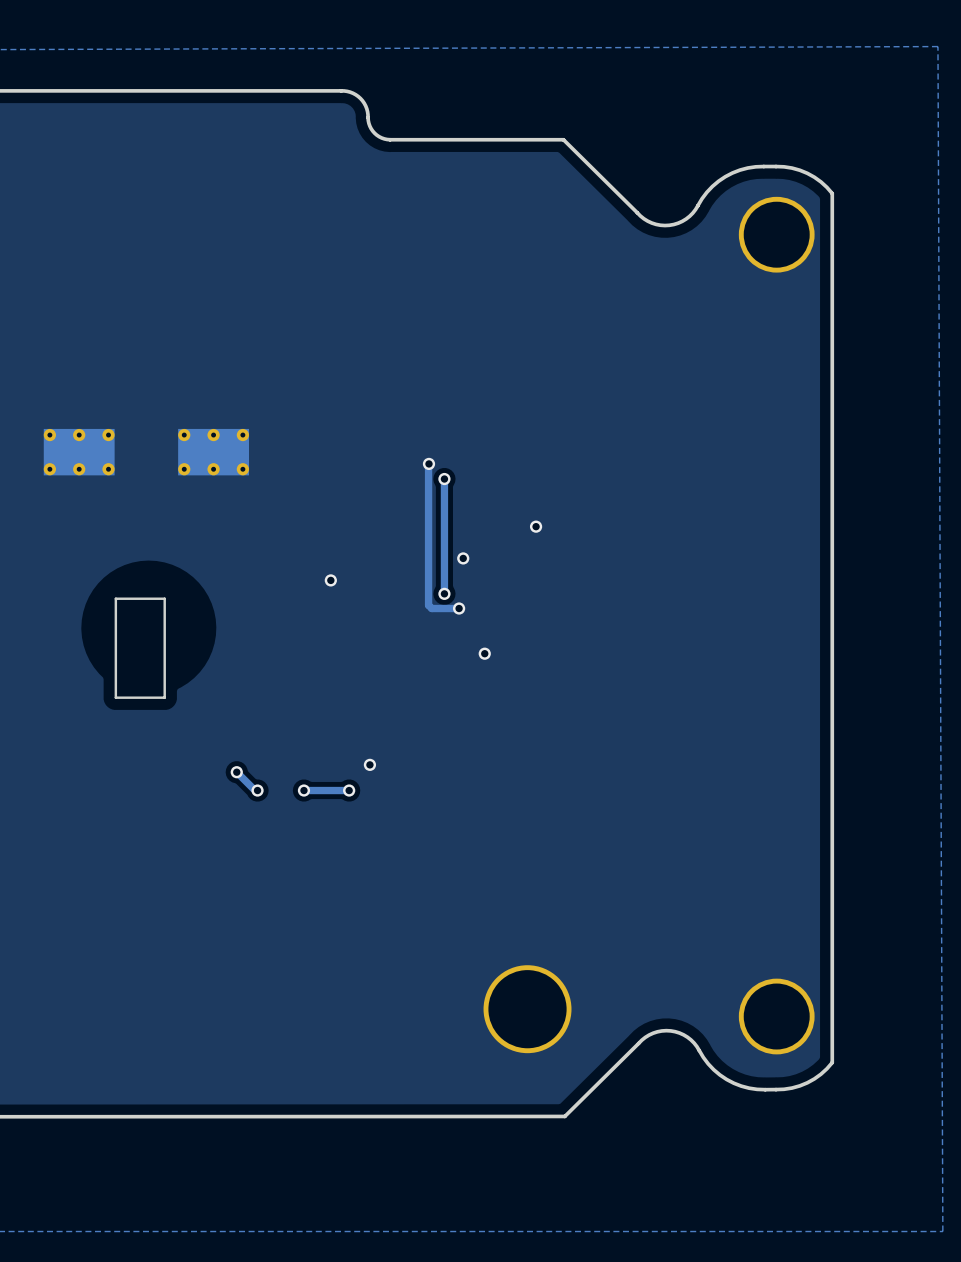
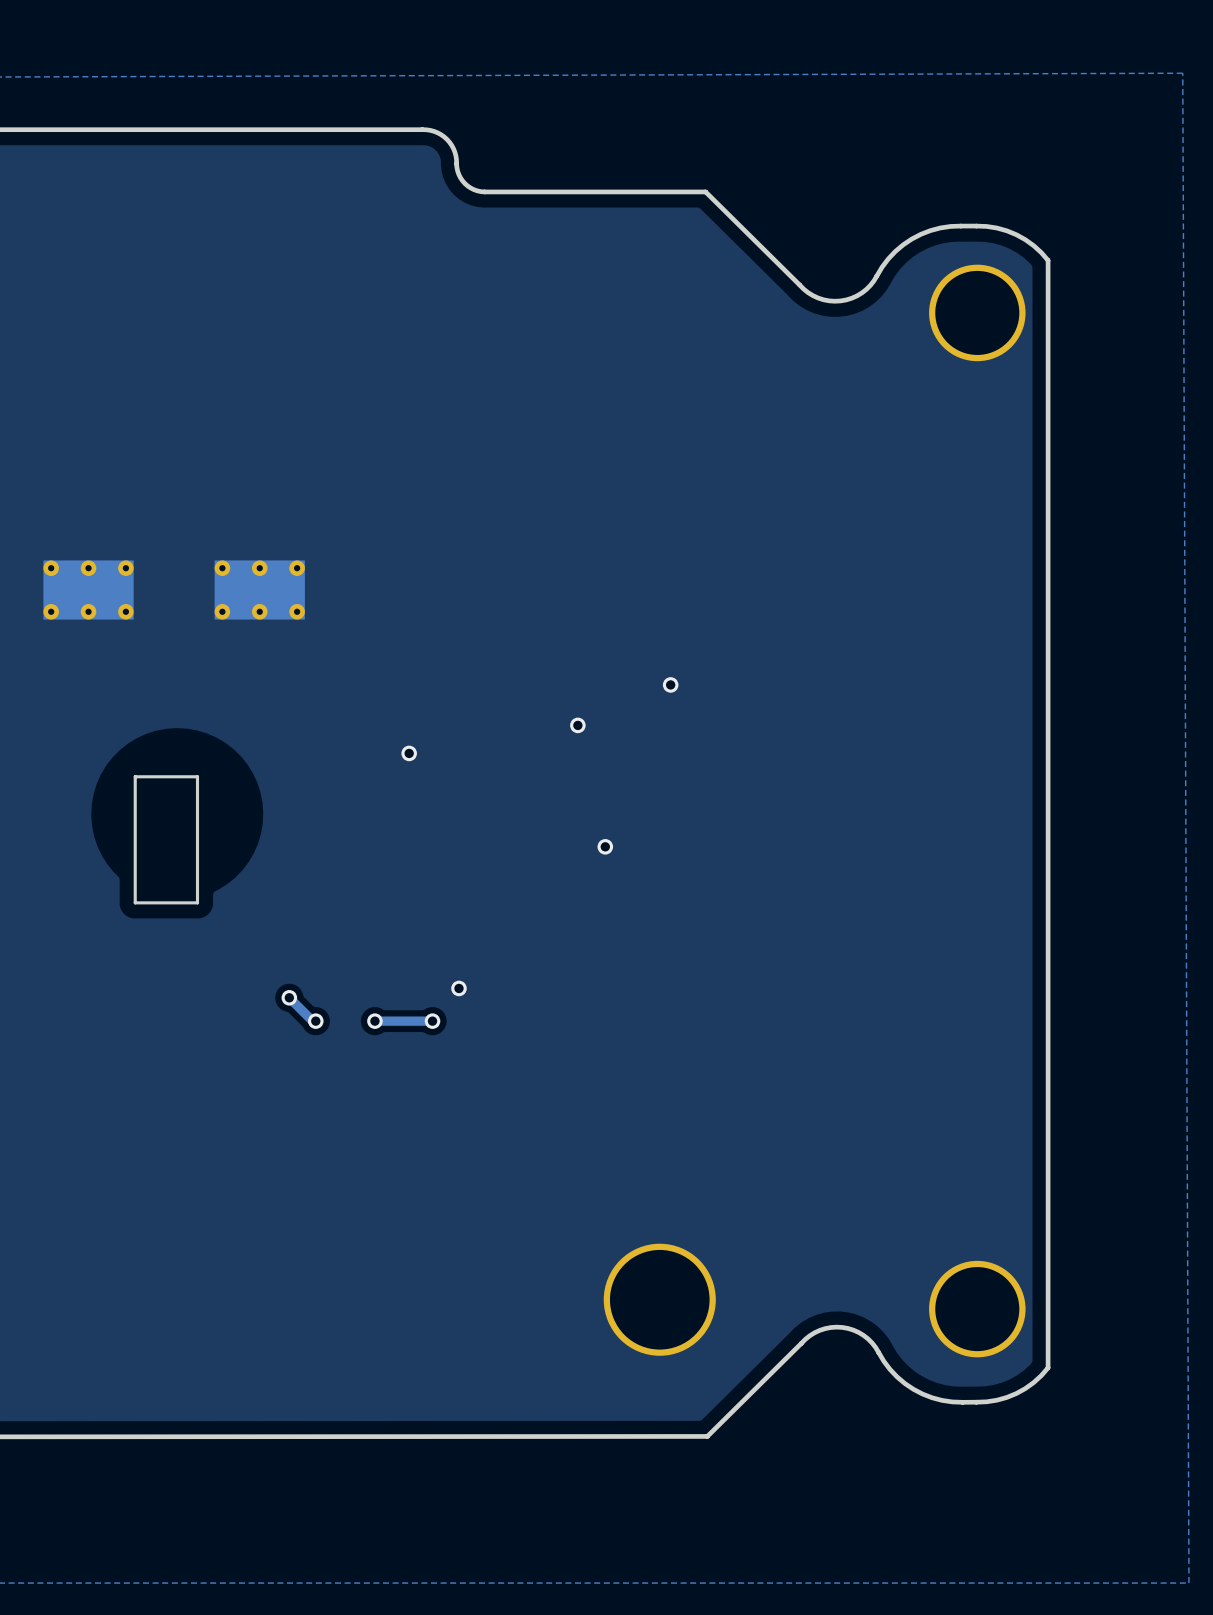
track: (428, 463) (428, 605) (431, 608) (459, 608) -> none
via: (428, 463) -> none
track: (444, 479) (444, 593) -> none
via: (444, 479) -> none
via: (444, 593) -> none
via: (459, 608) -> none

